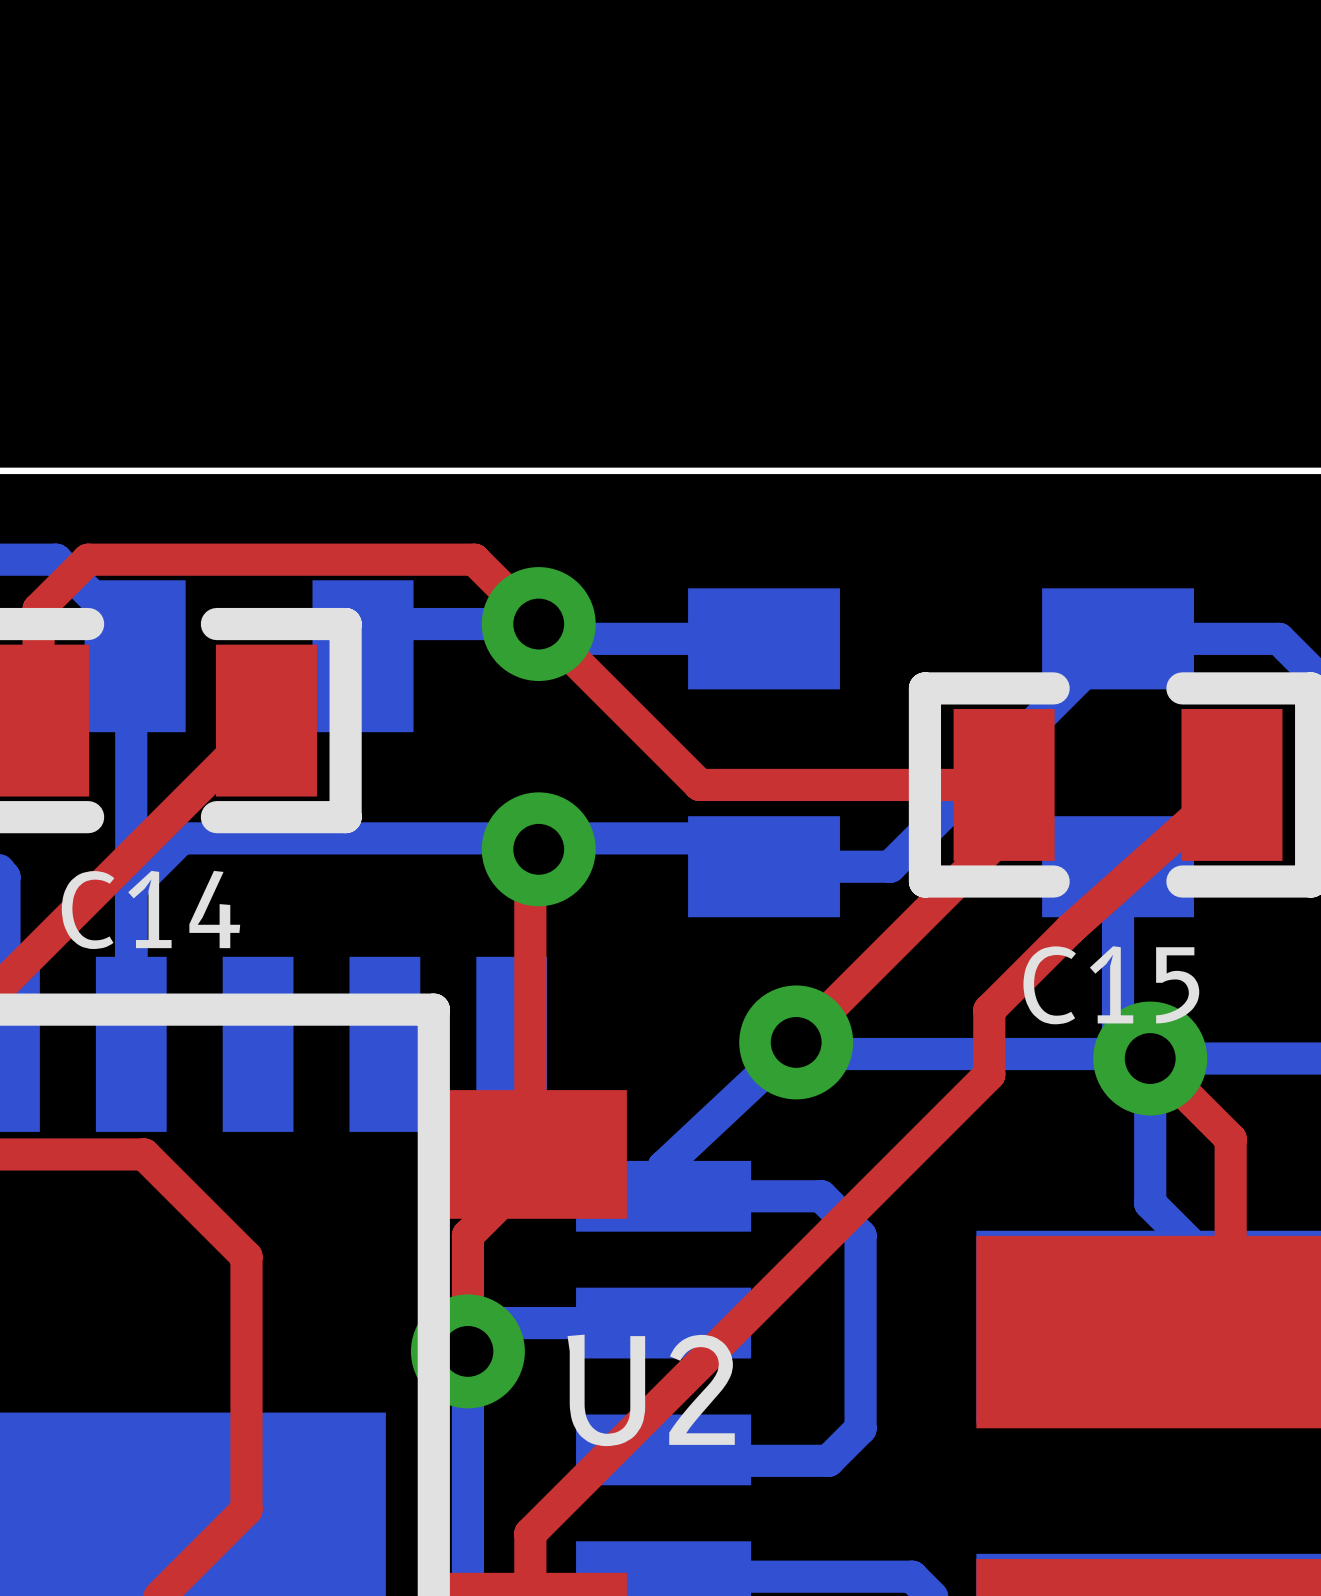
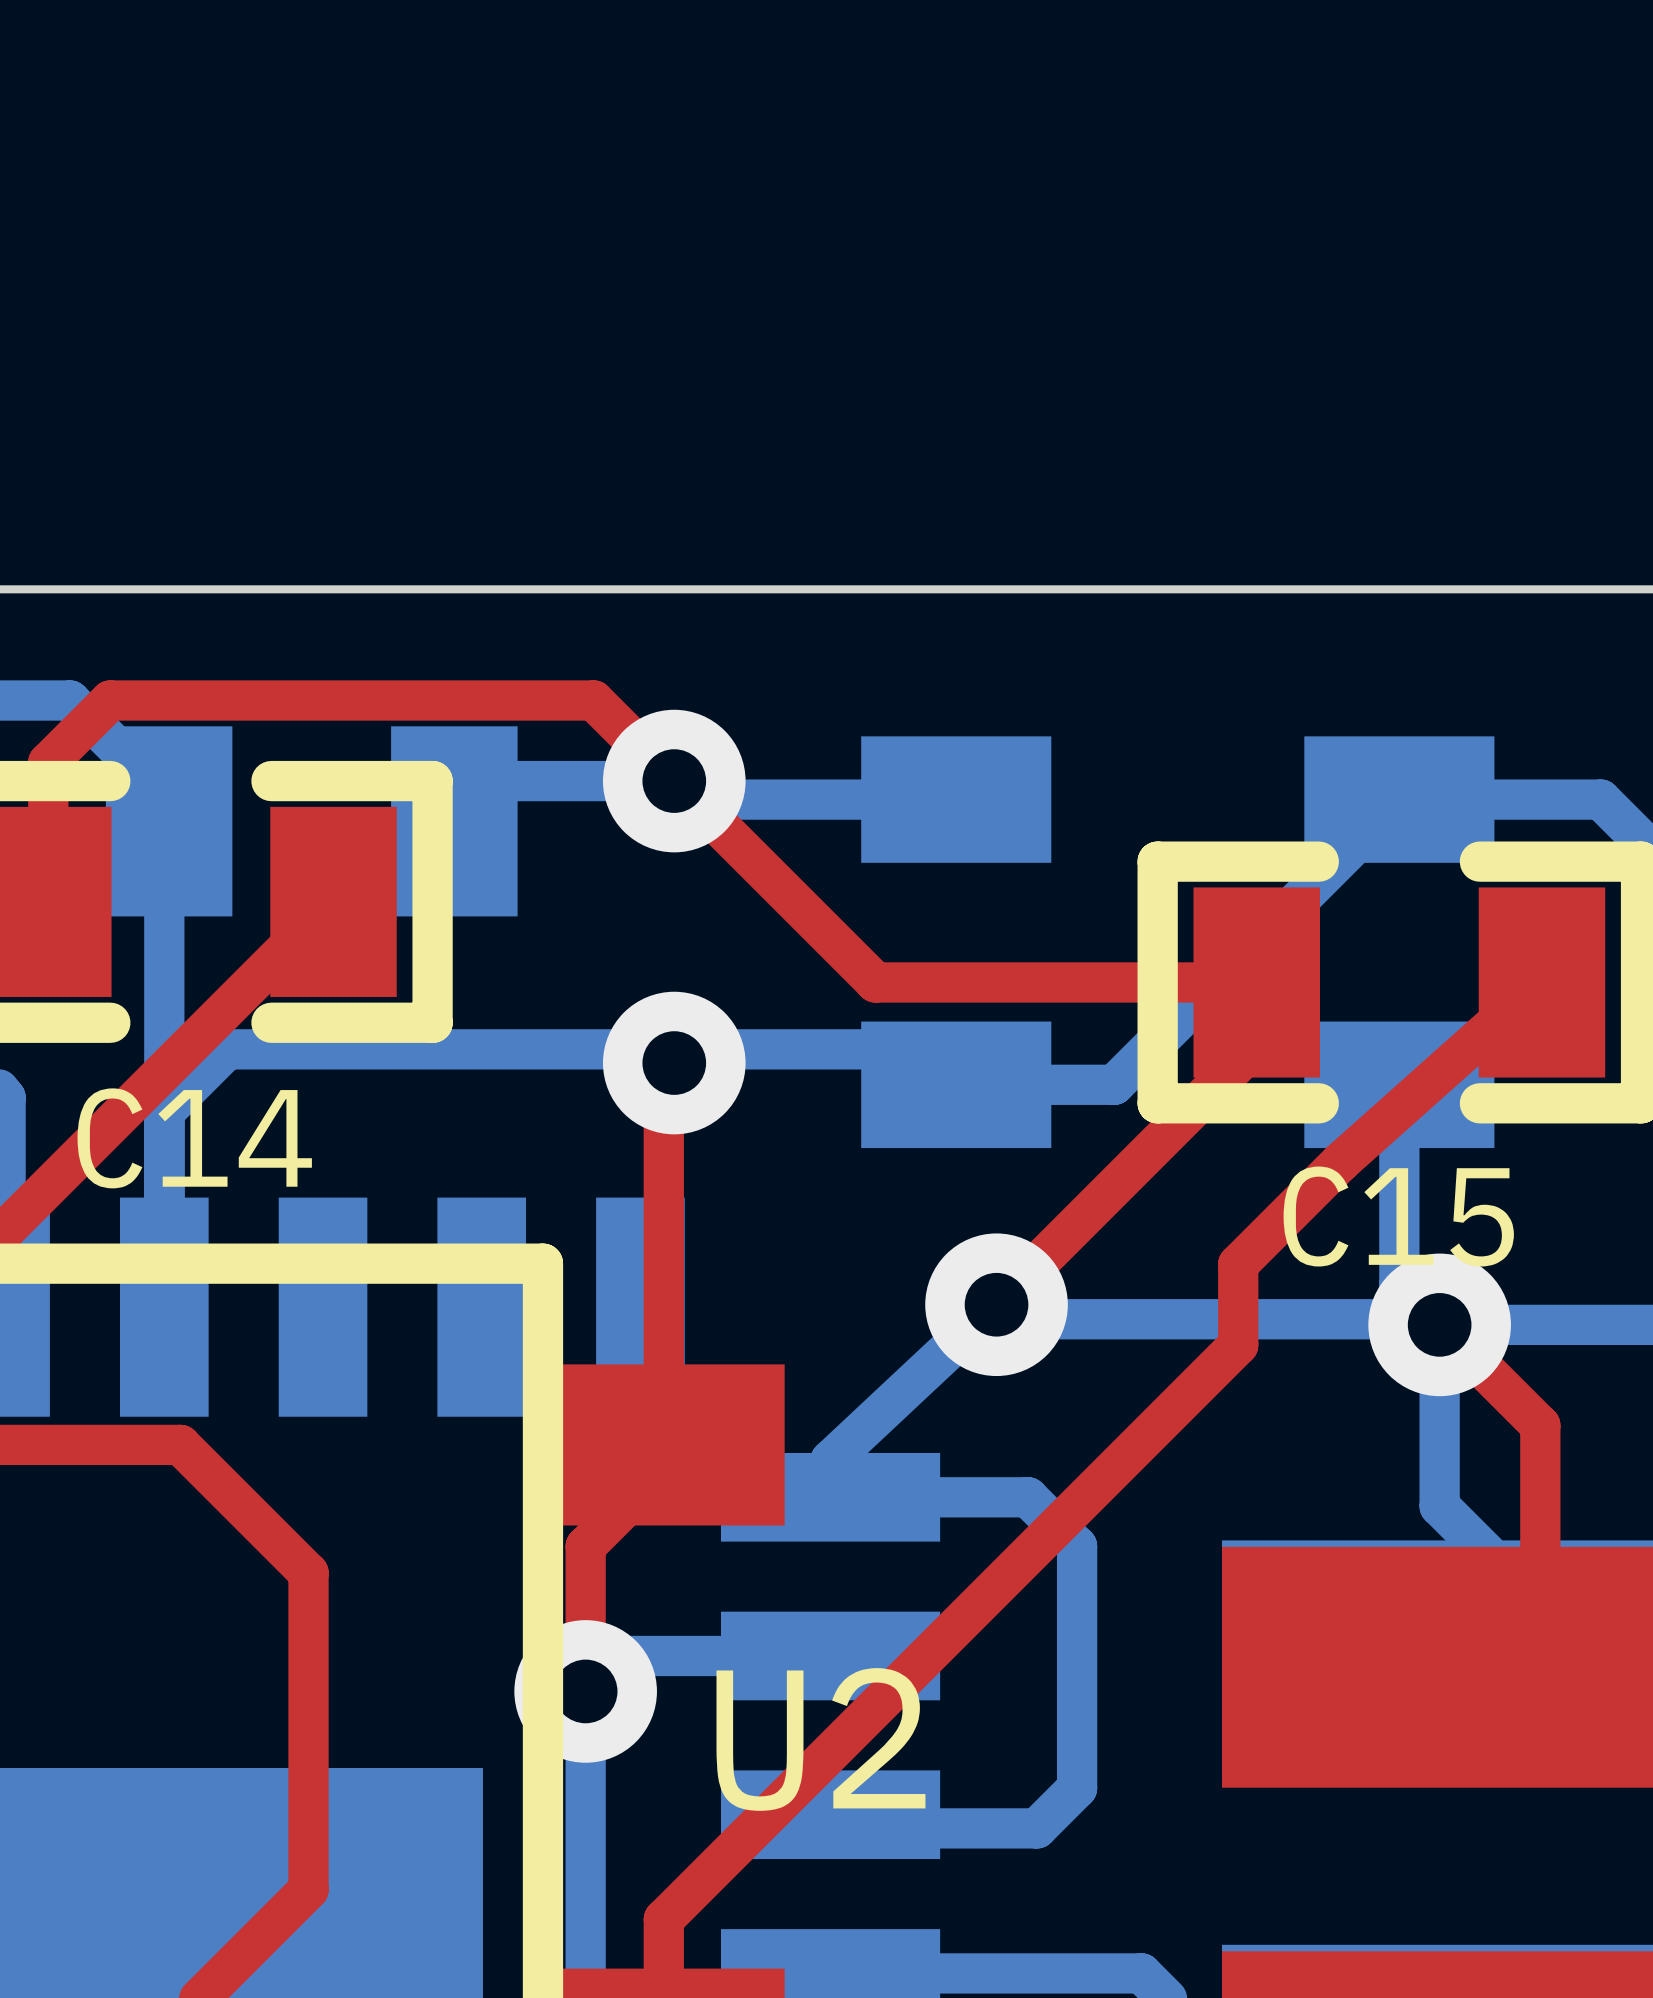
C15 name position: C15 (1111, 985) -> C15 (1398, 1216)

